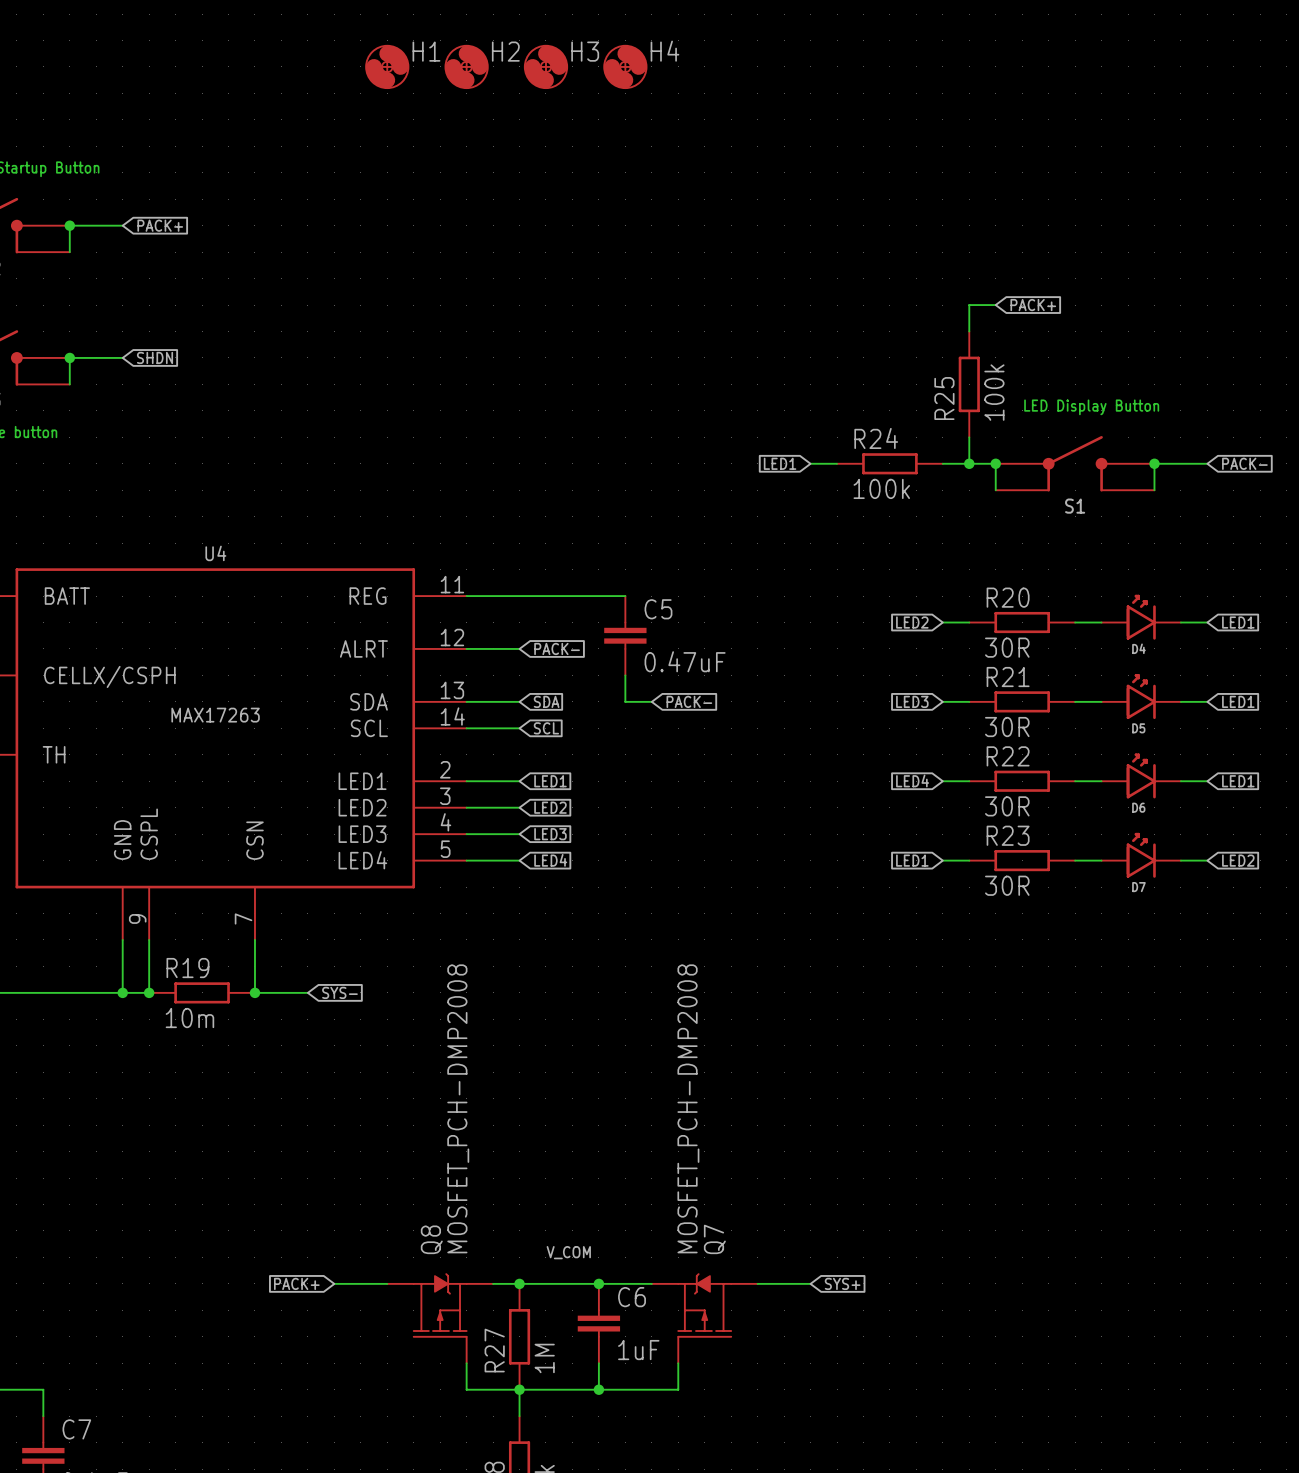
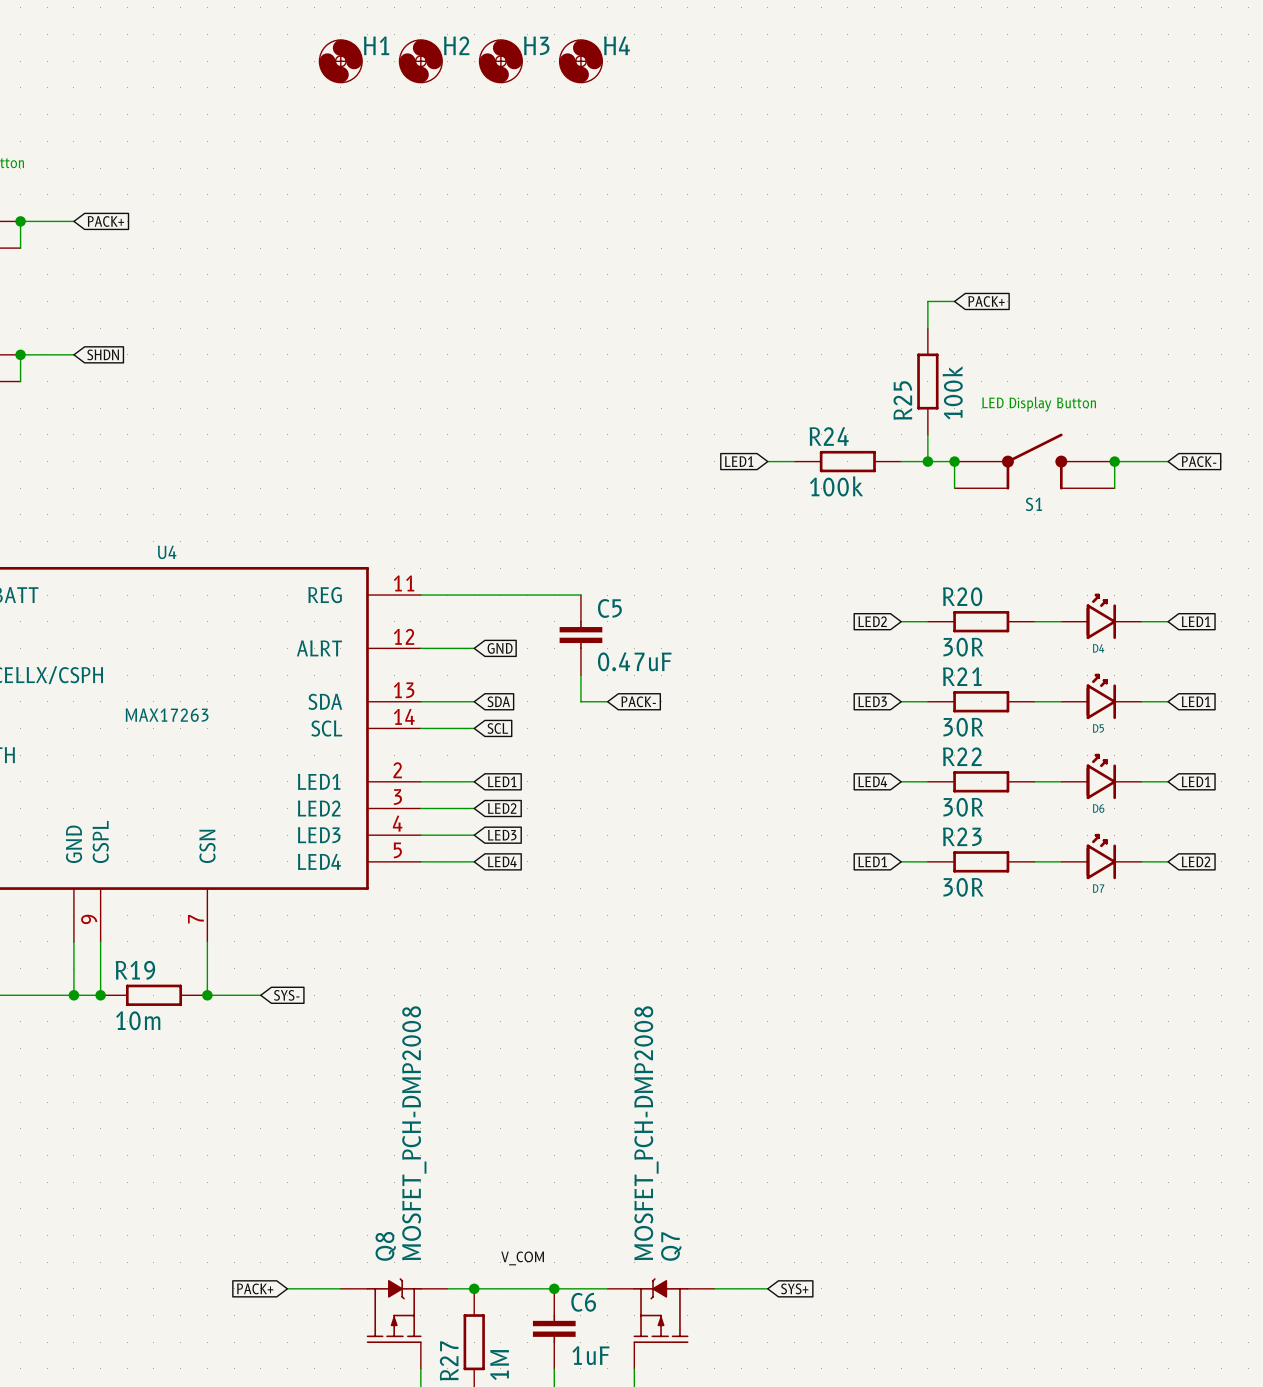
global label: PACK- (557, 648) -> GND (500, 648)

